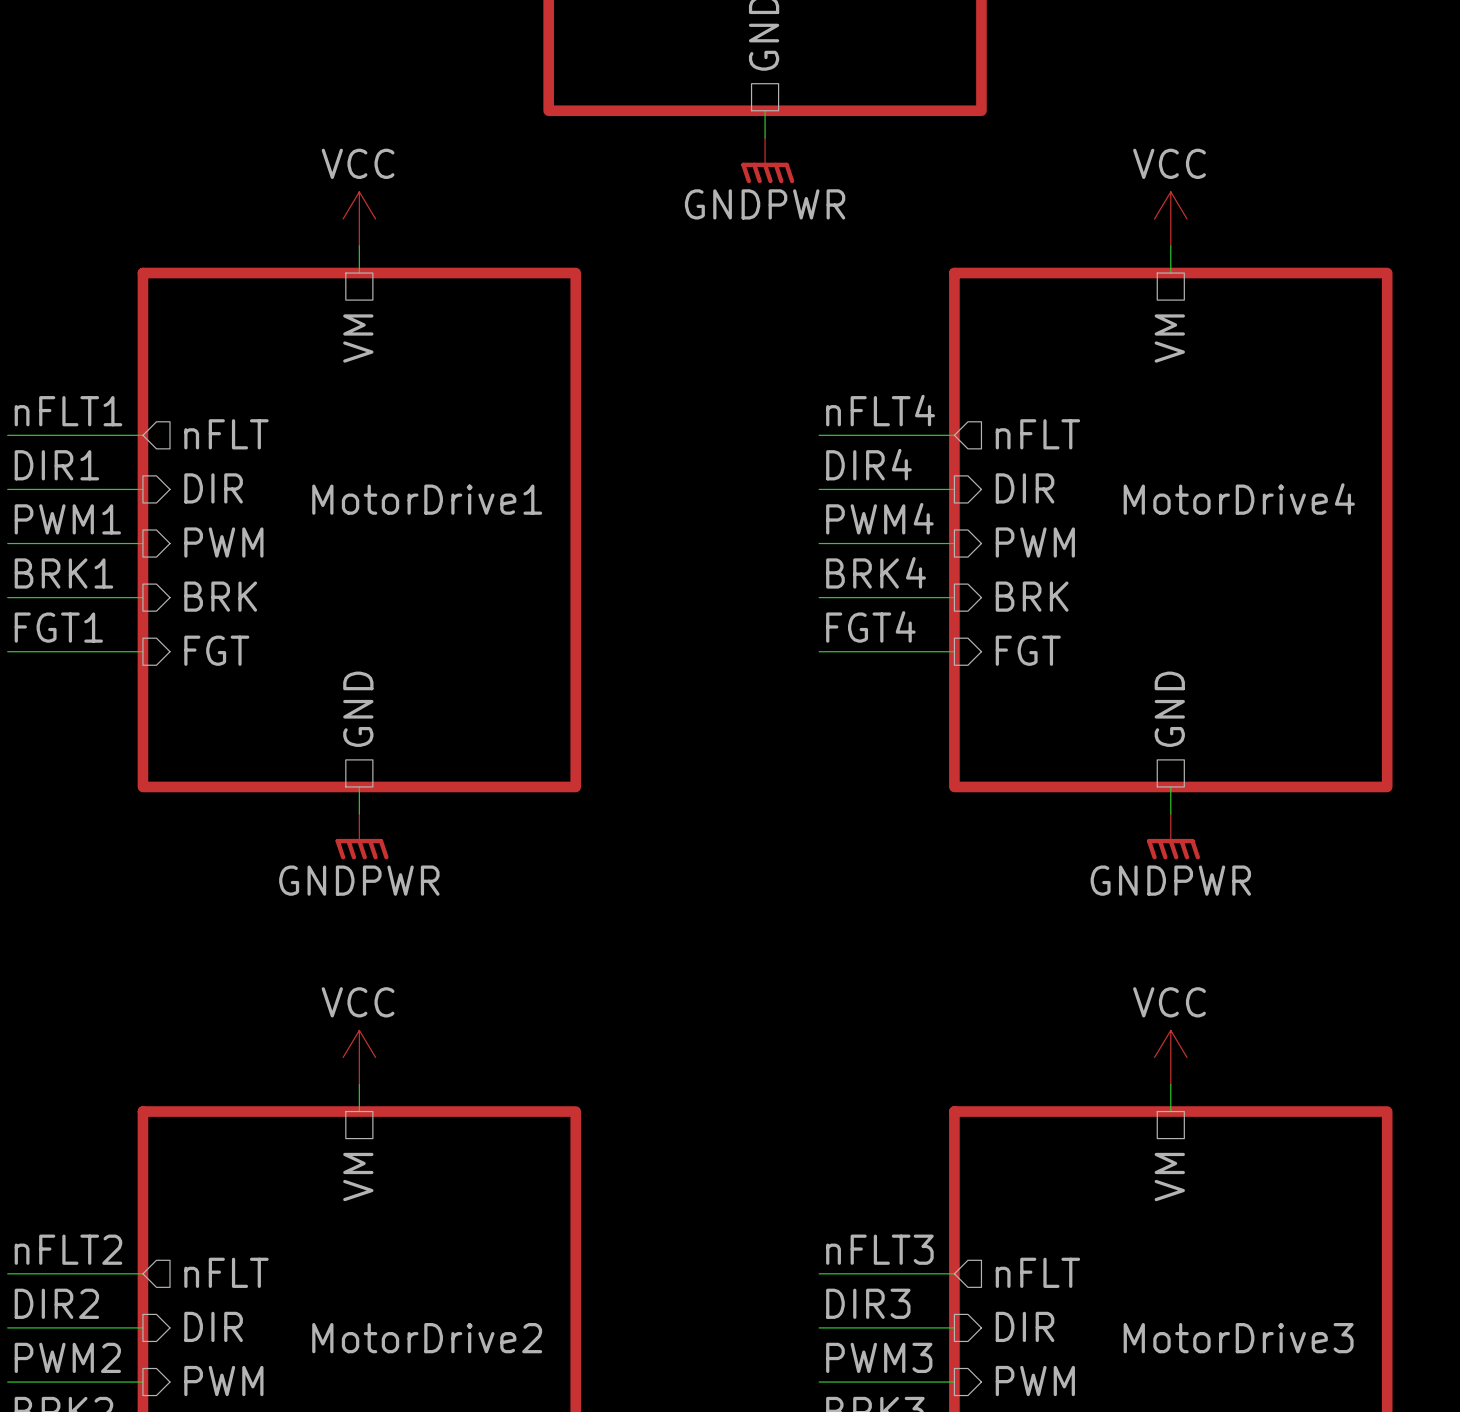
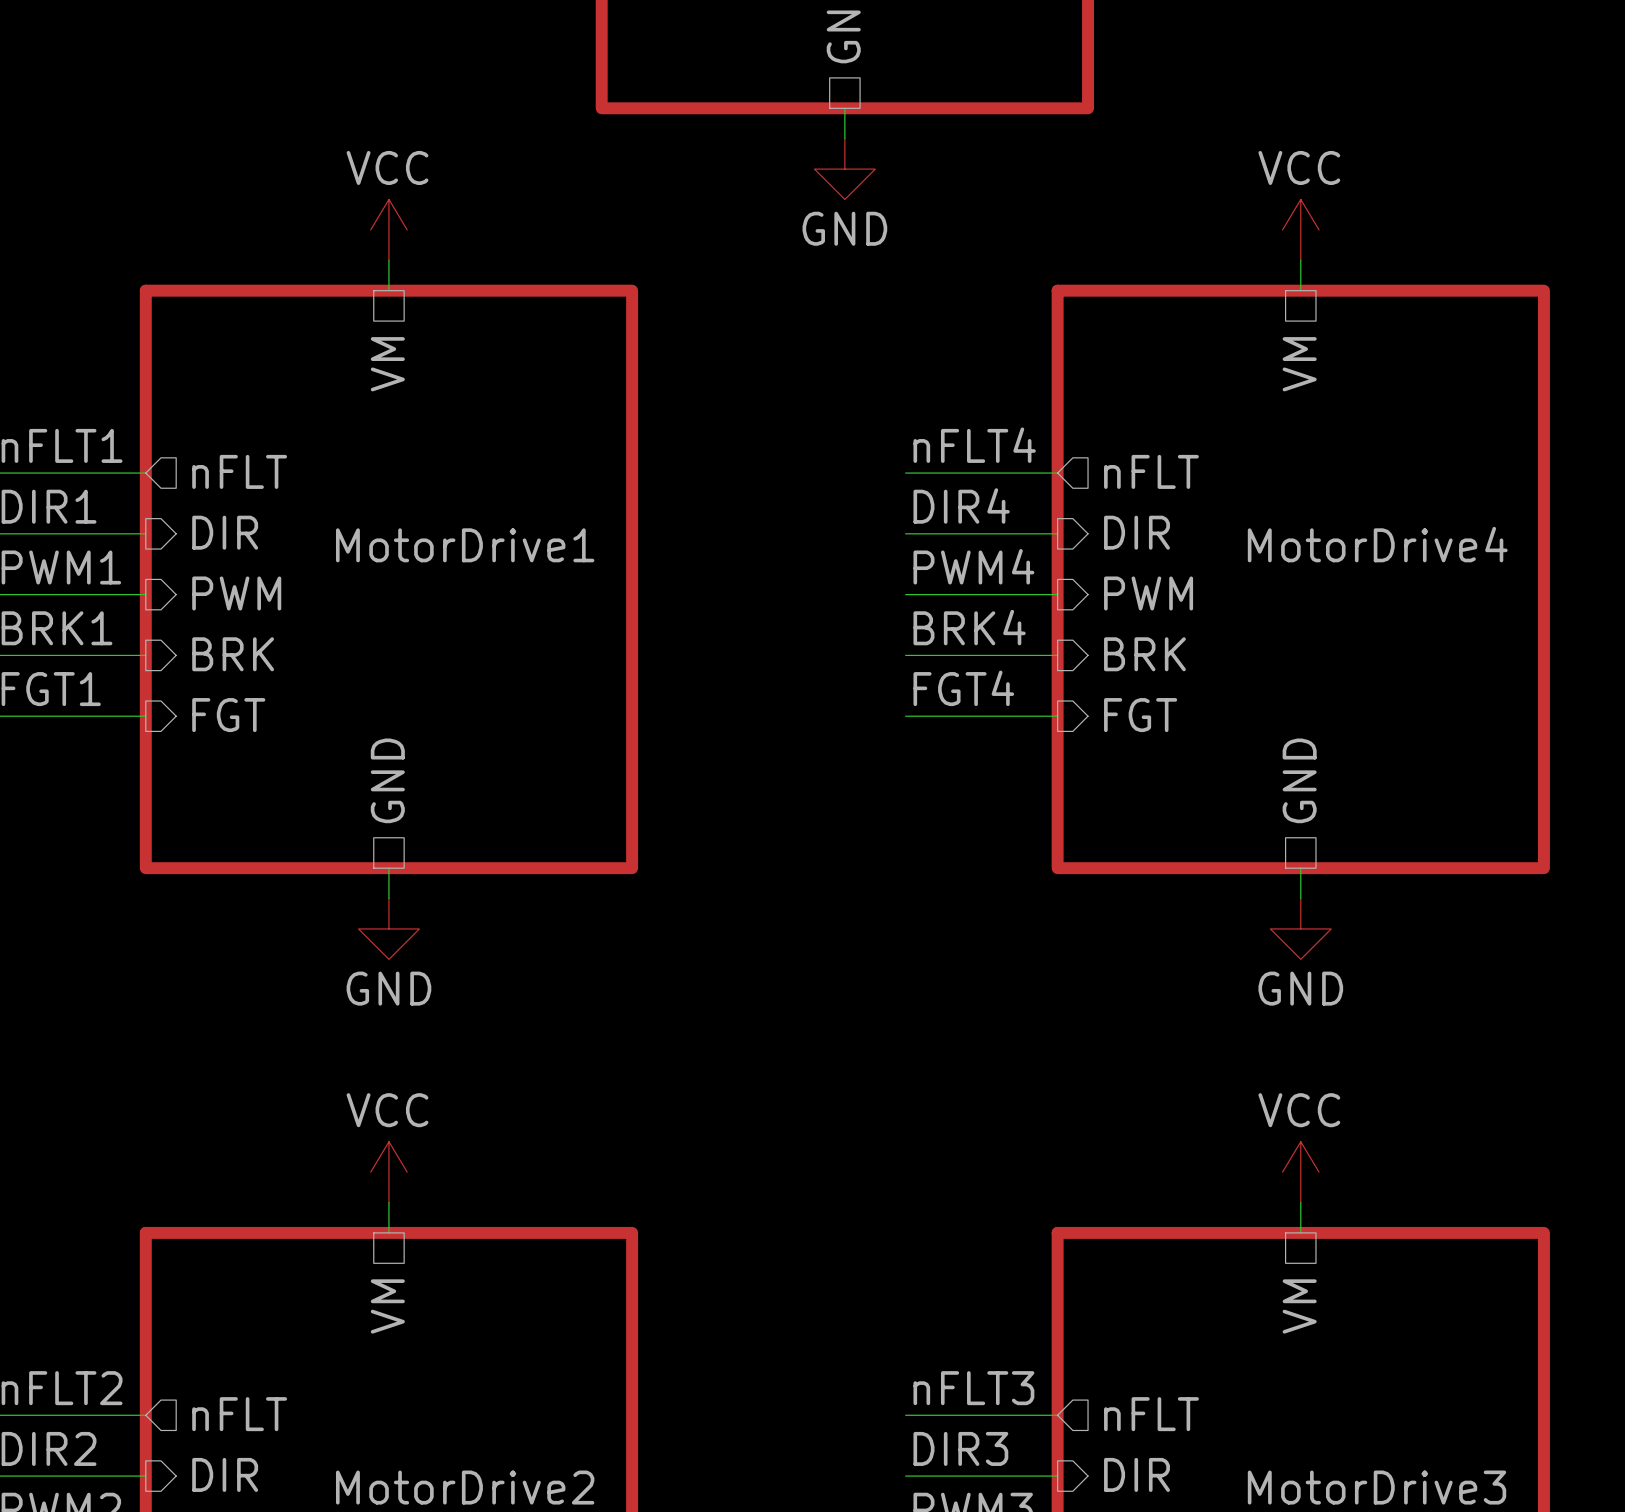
power symbol: GNDPWR (767, 160) -> GND (844, 169)
power symbol: GNDPWR (362, 836) -> GND (388, 928)
power symbol: GNDPWR (1173, 836) -> GND (1300, 928)

